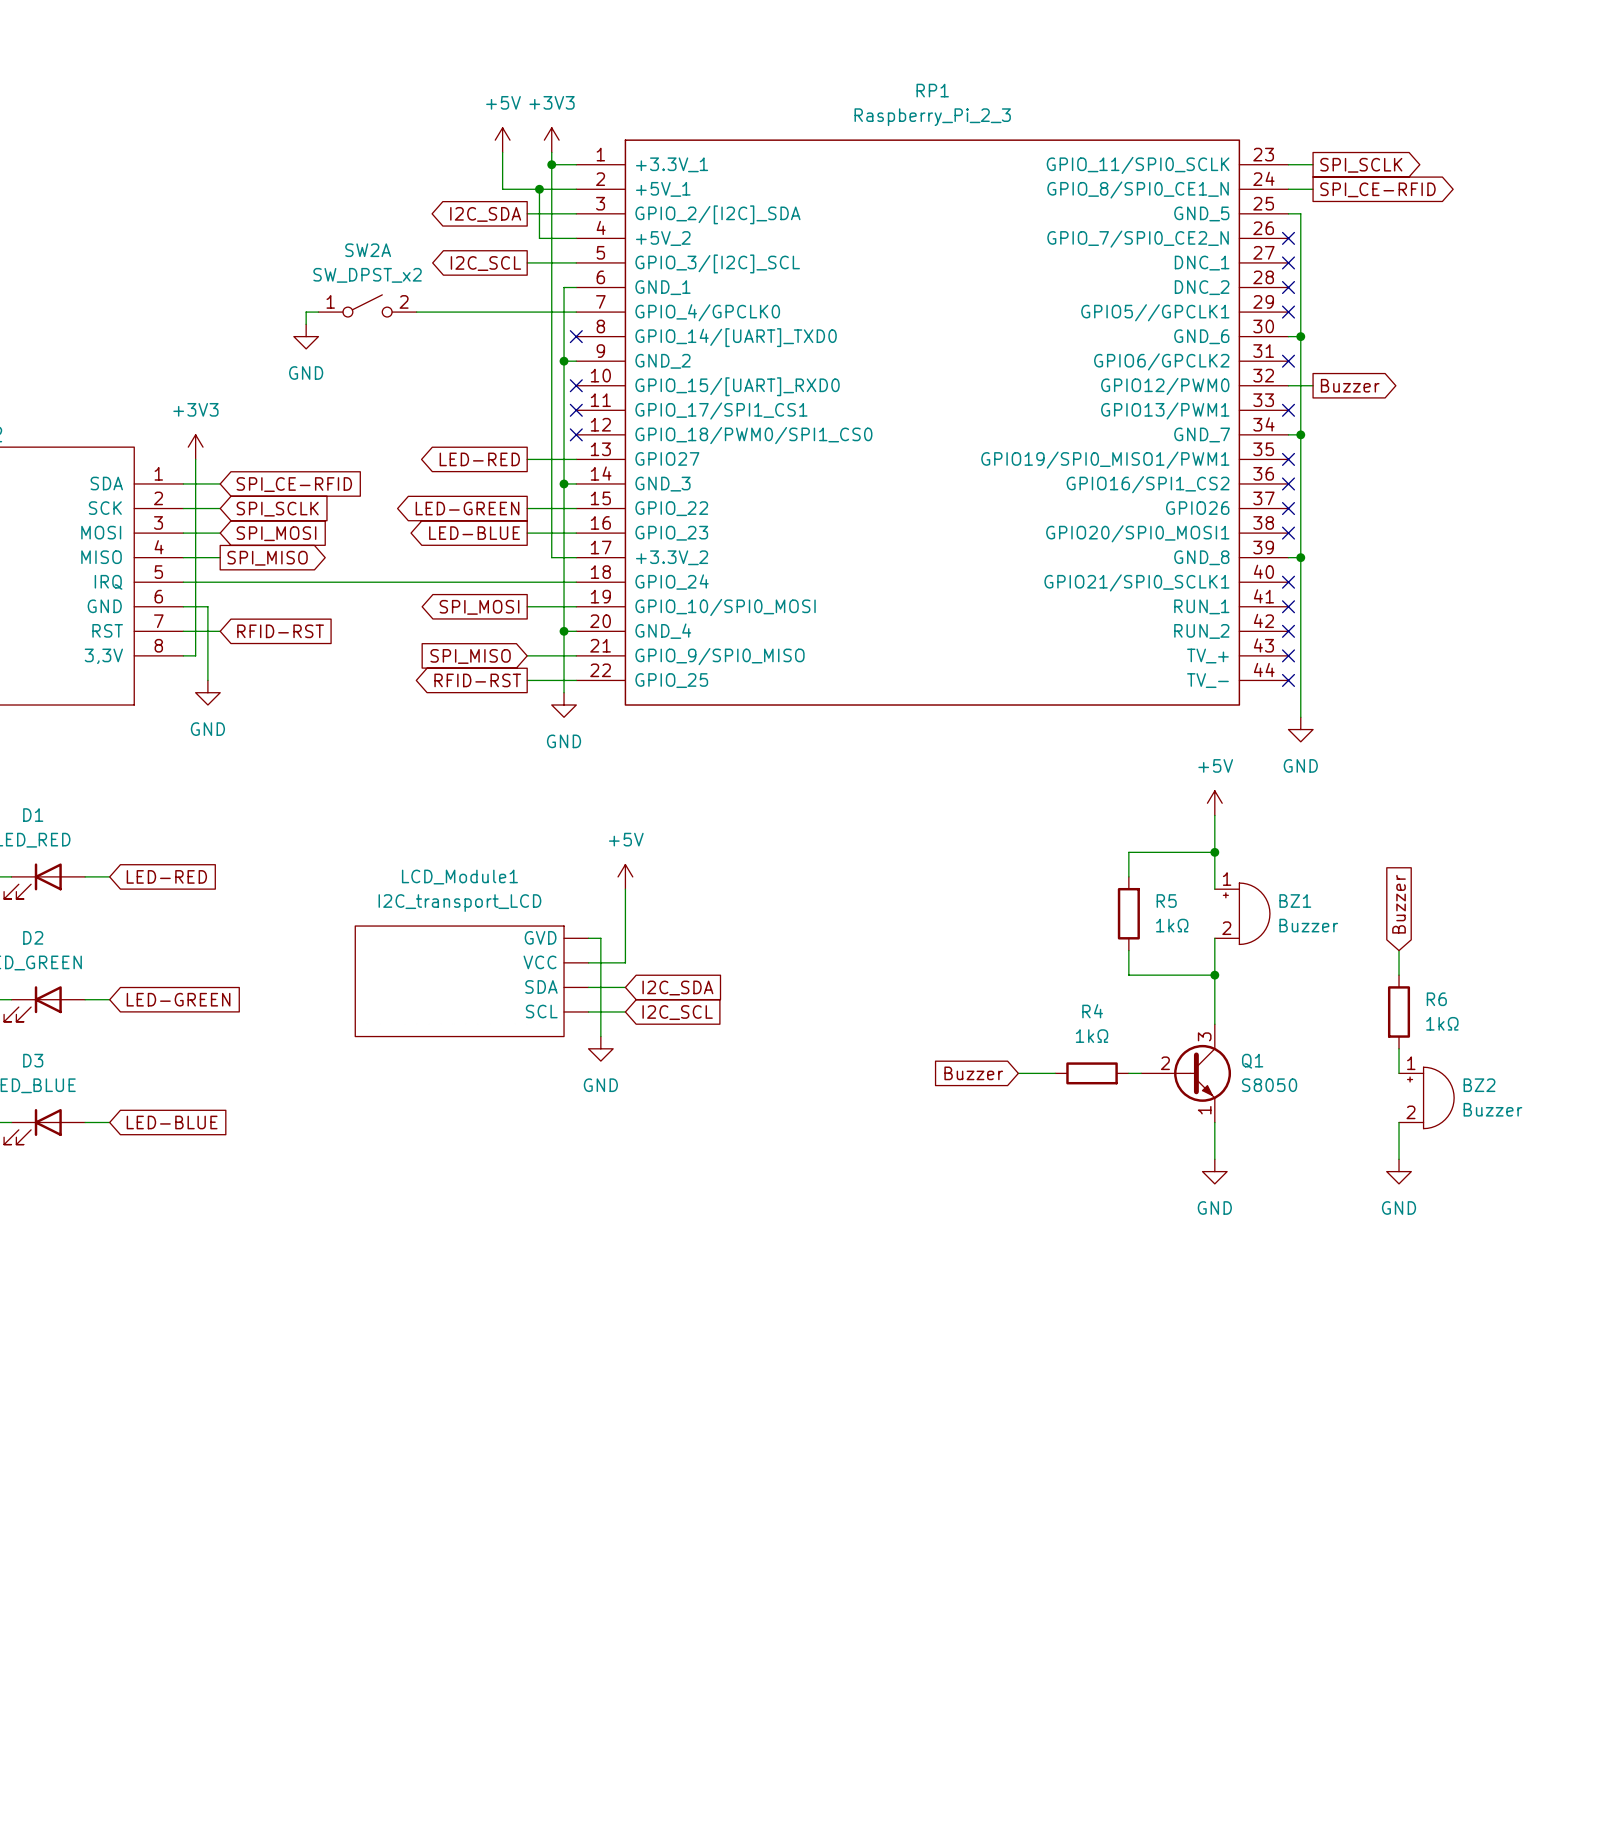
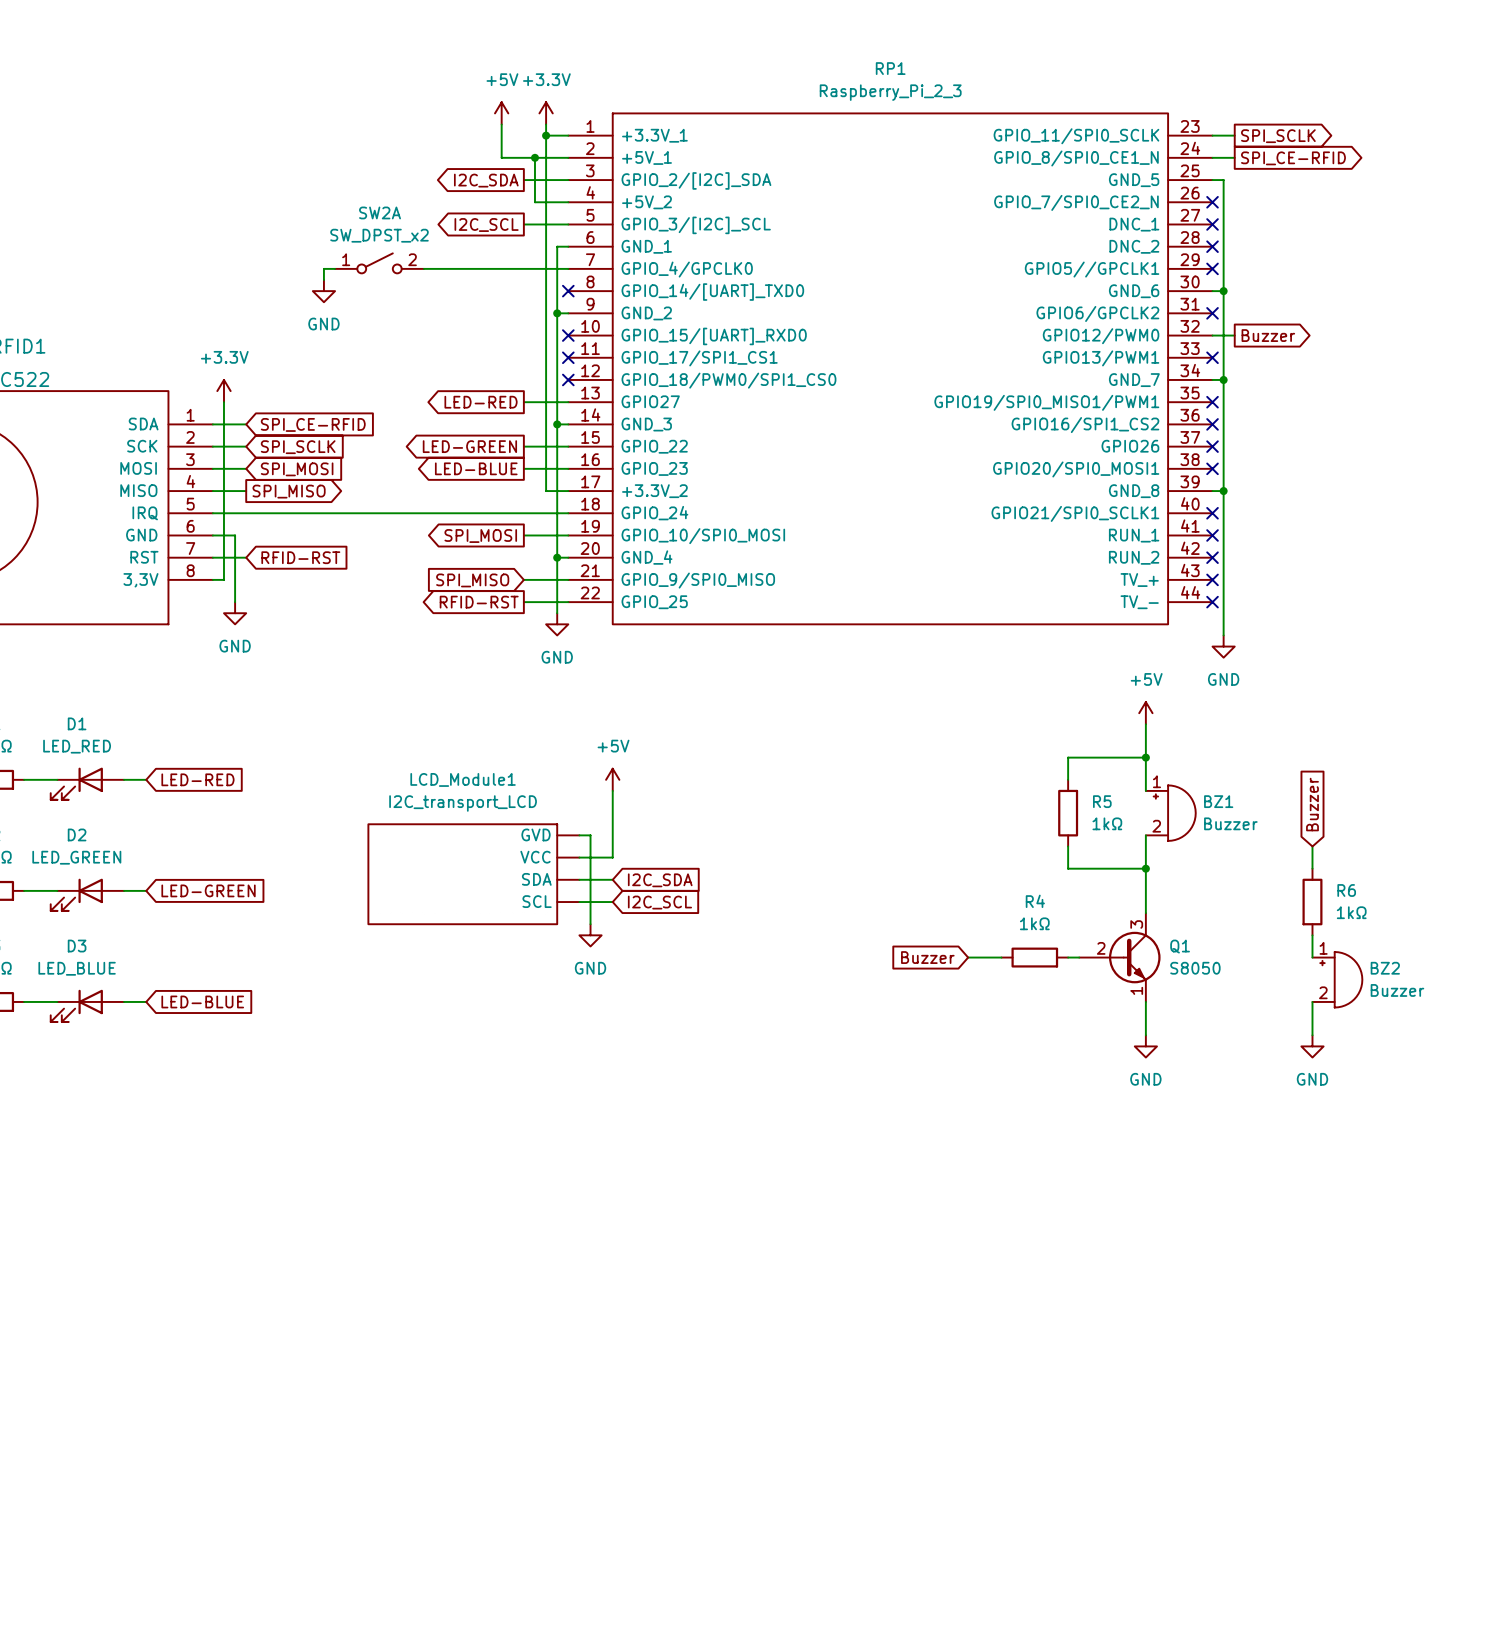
power symbol: +3V3 (551, 140) -> +3.3V (546, 113)
power symbol: +3V3 (195, 447) -> +3.3V (223, 391)

